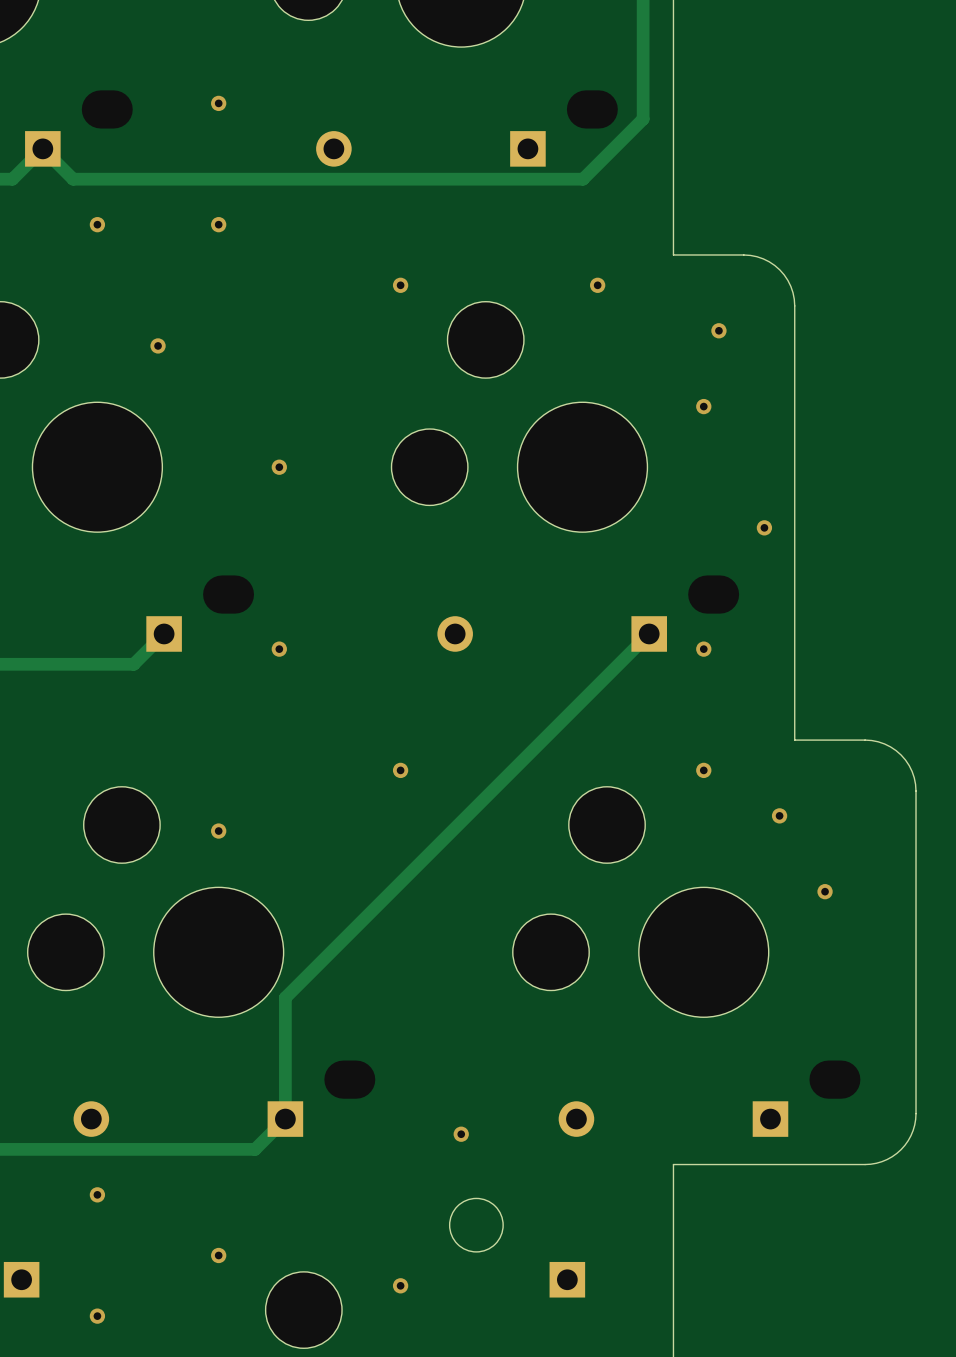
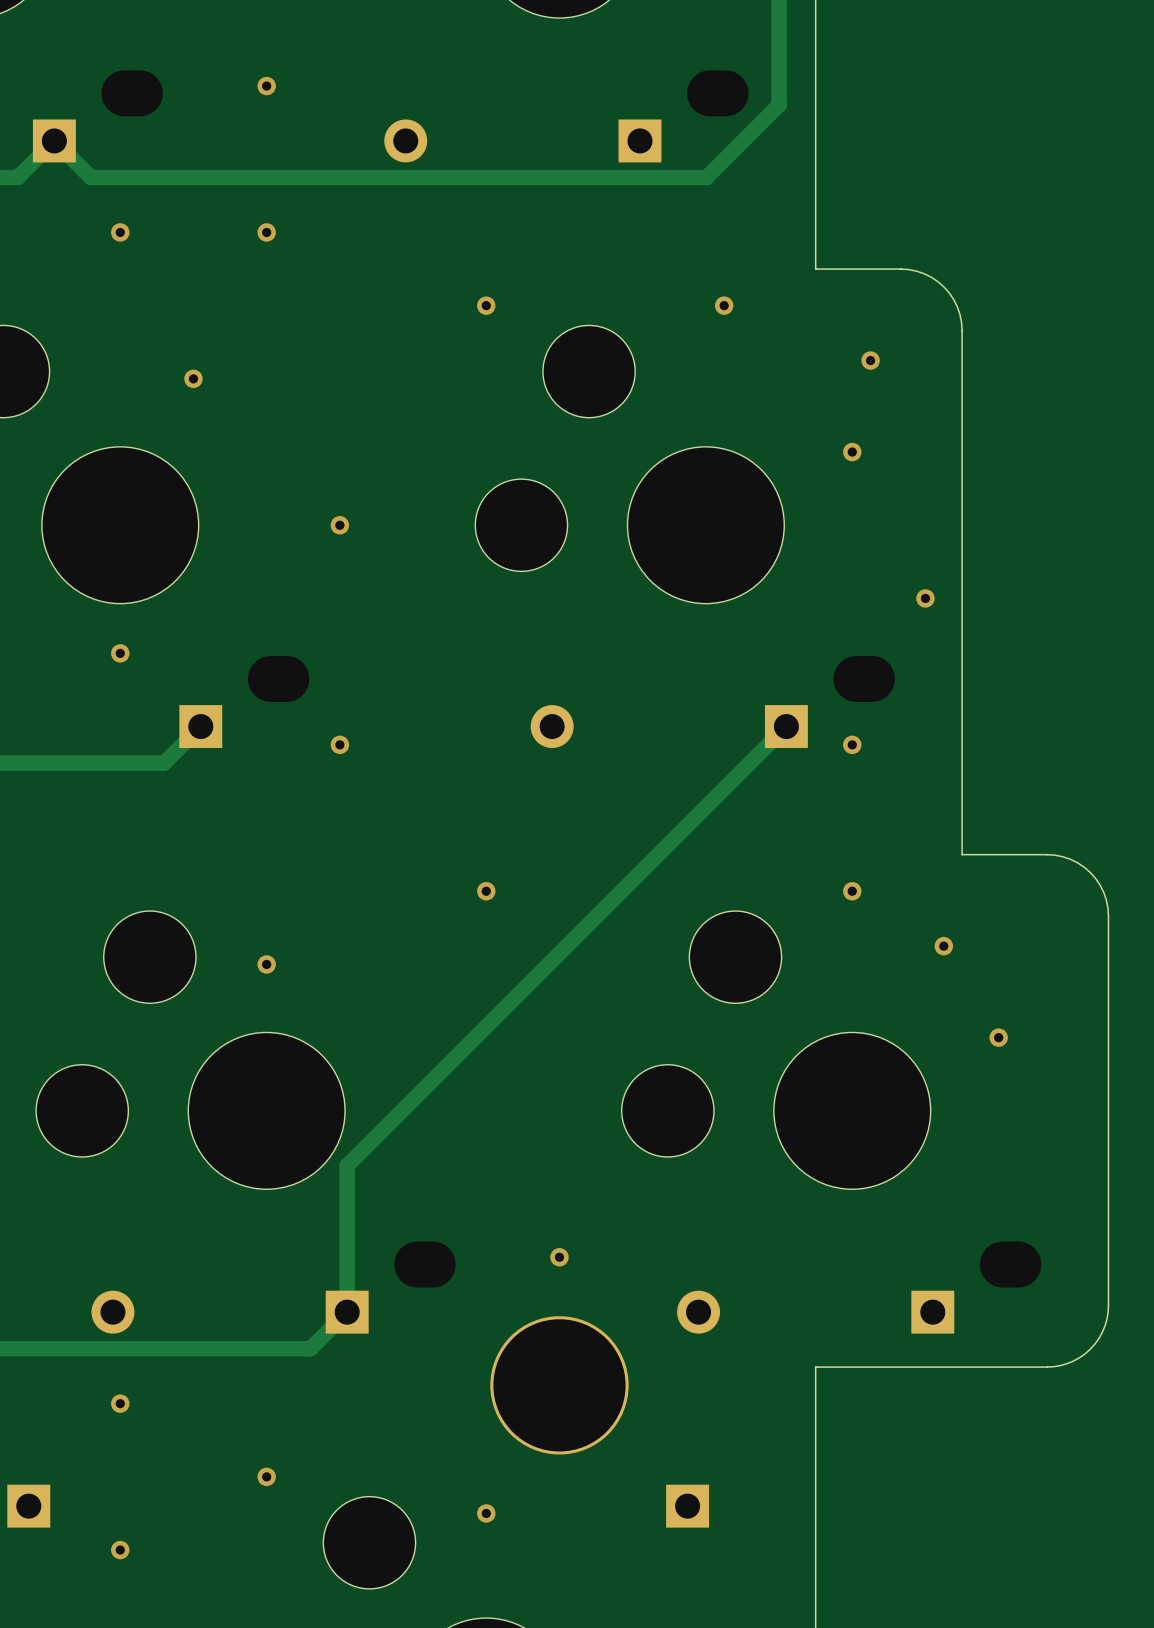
via: none -> (120, 653)
via position: (461, 1134) -> (559, 1257)
part: none -> (559, 1385)
round board edge: [449, 1197, 504, 1253] -> none

